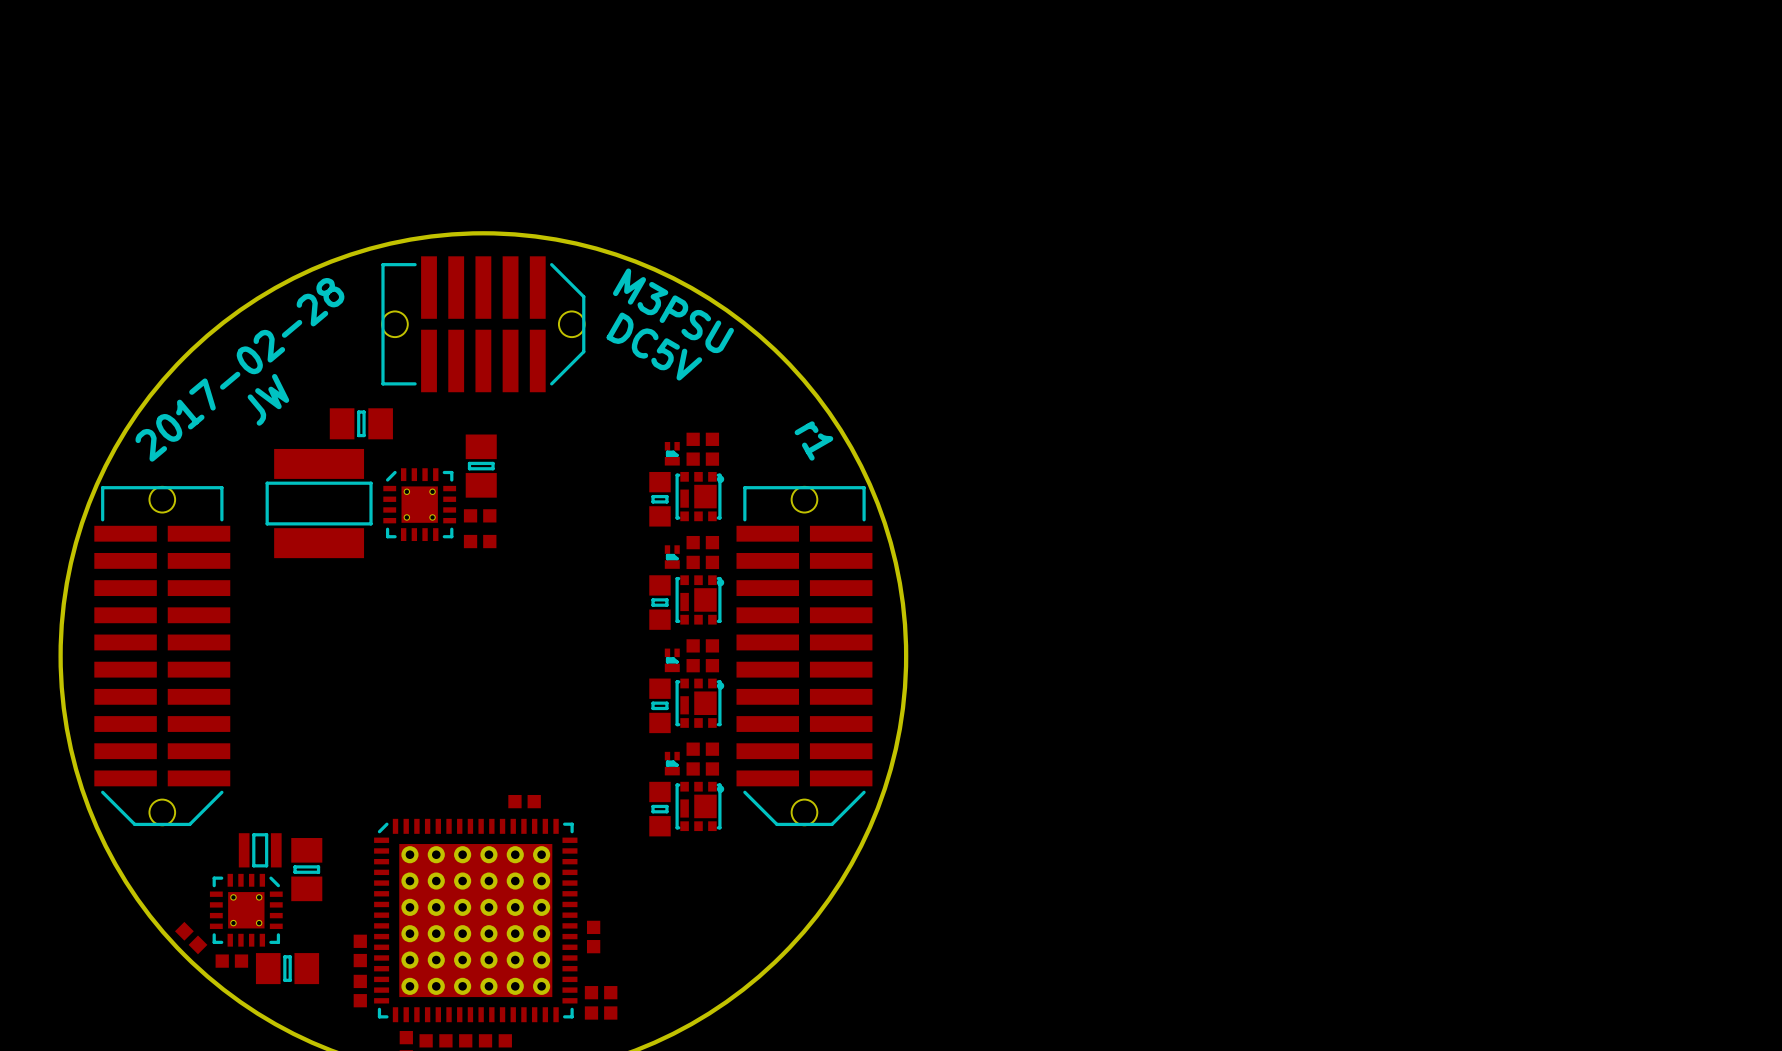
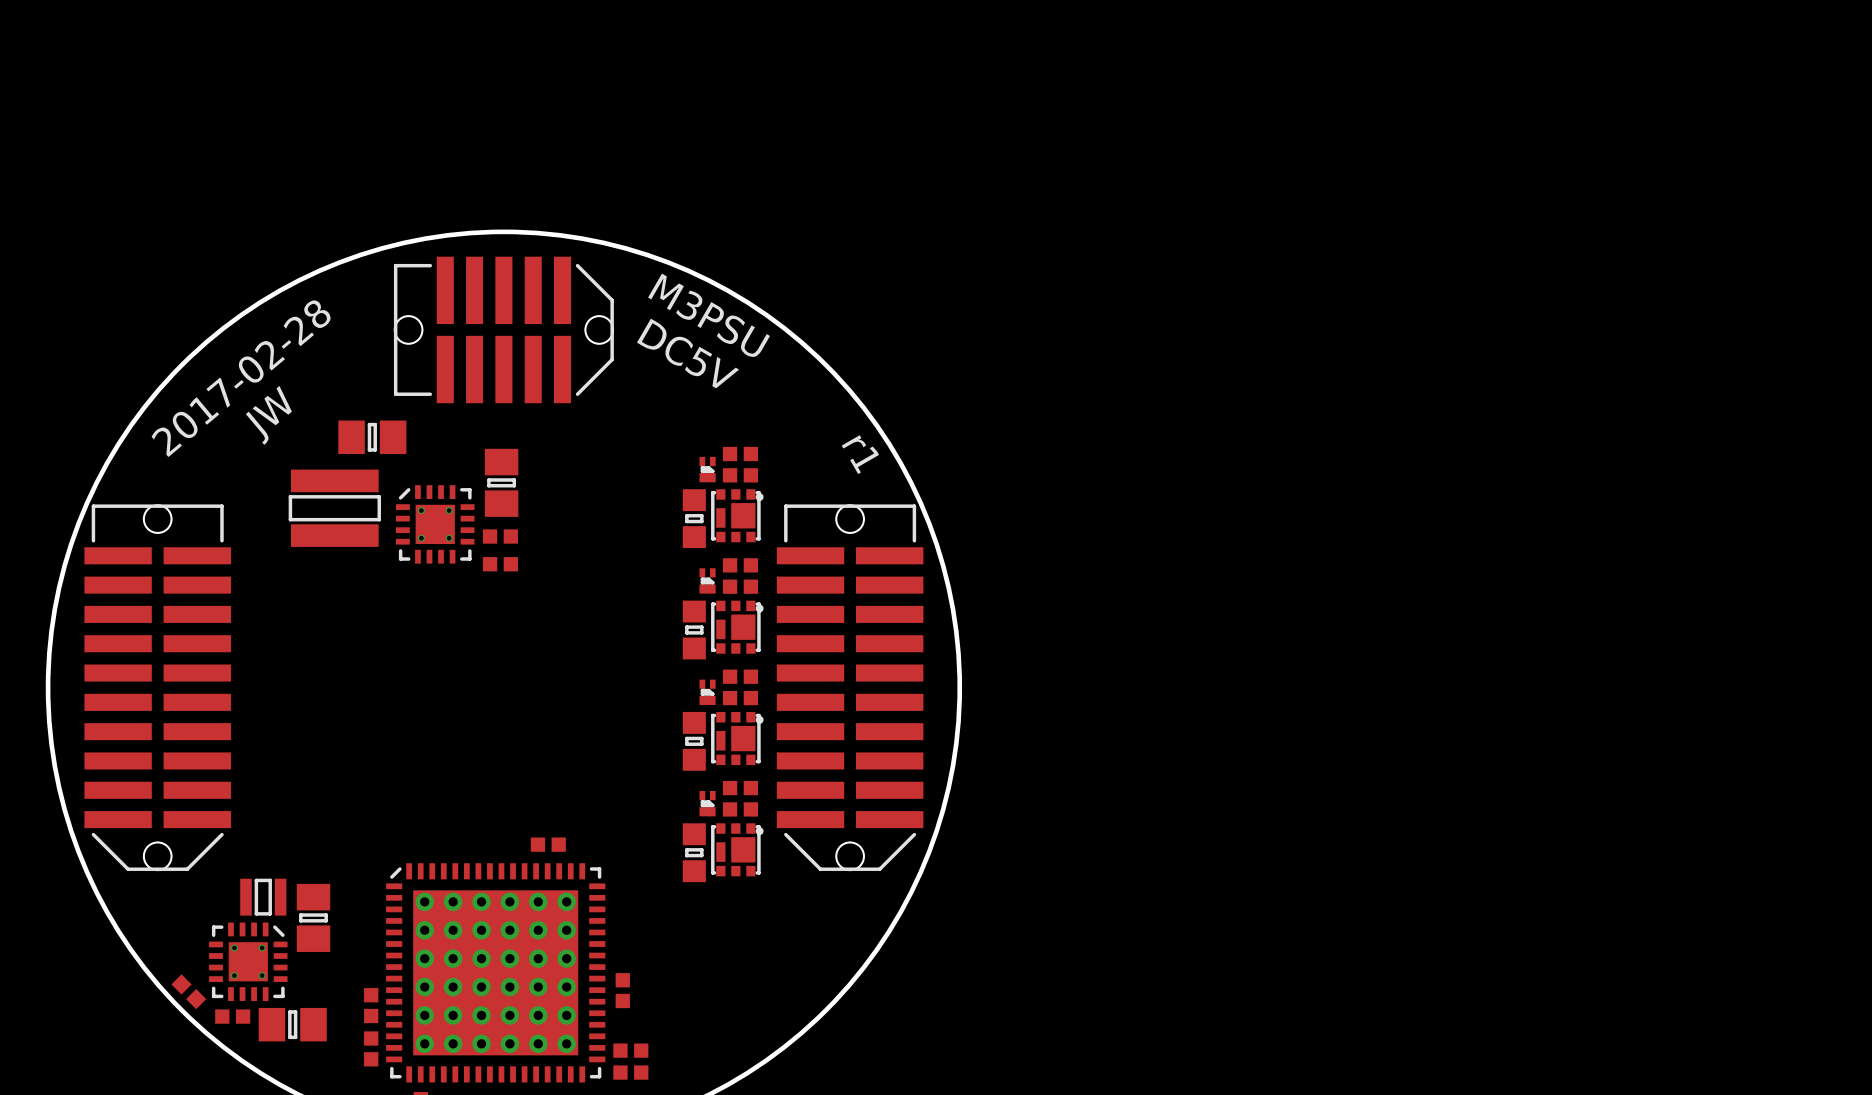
part footprint: [265, 448, 373, 559] -> [288, 469, 382, 547]

